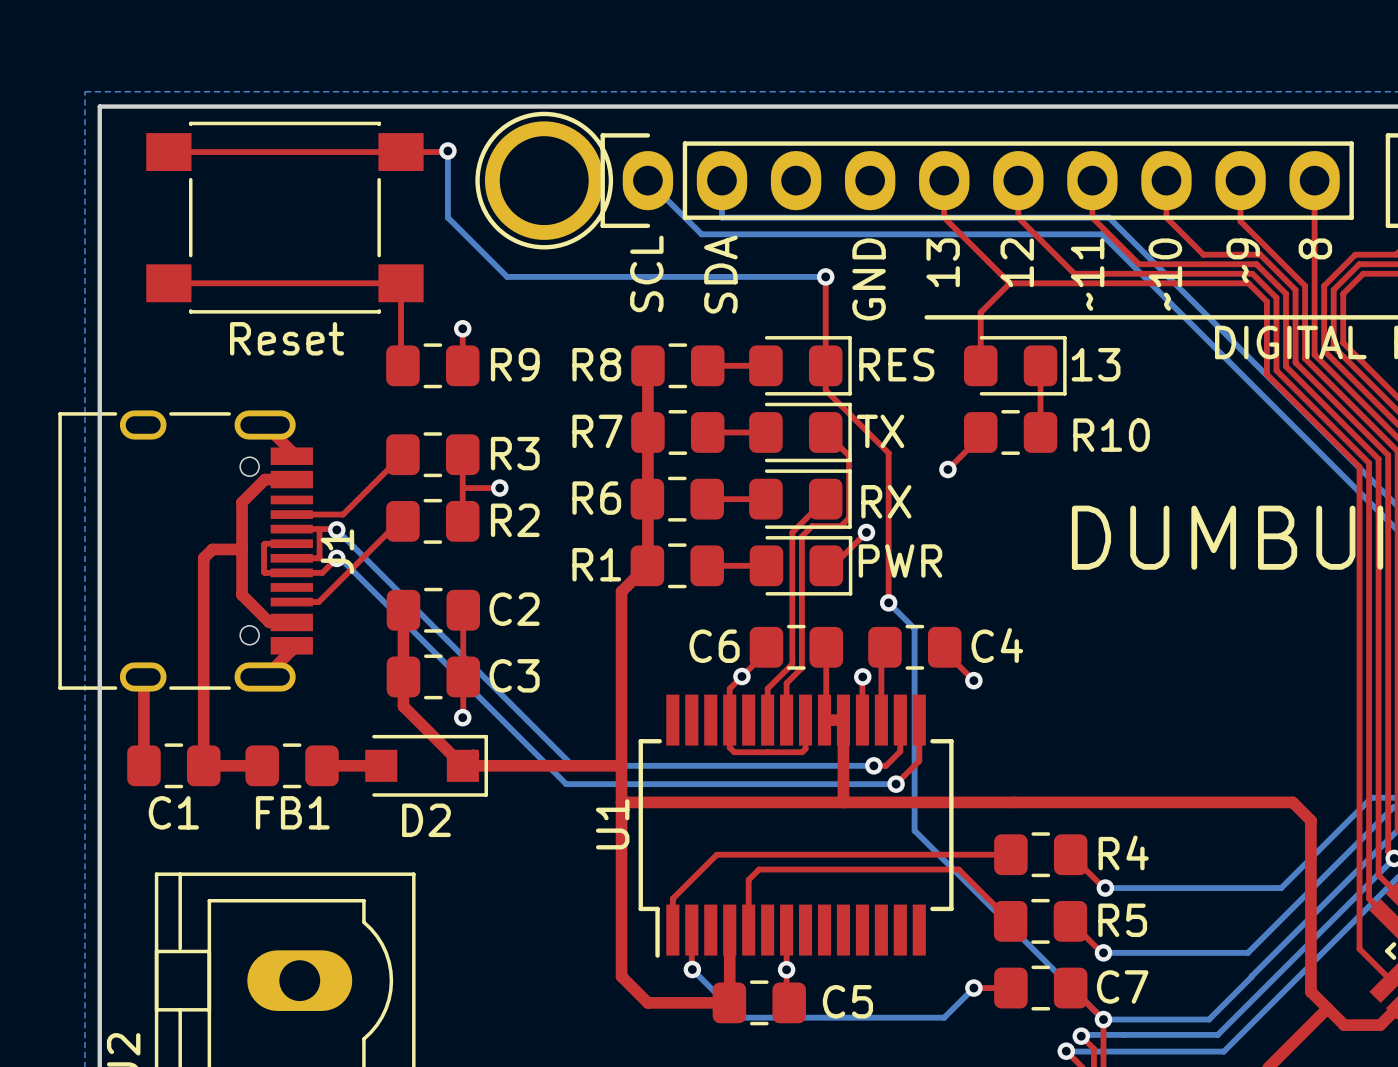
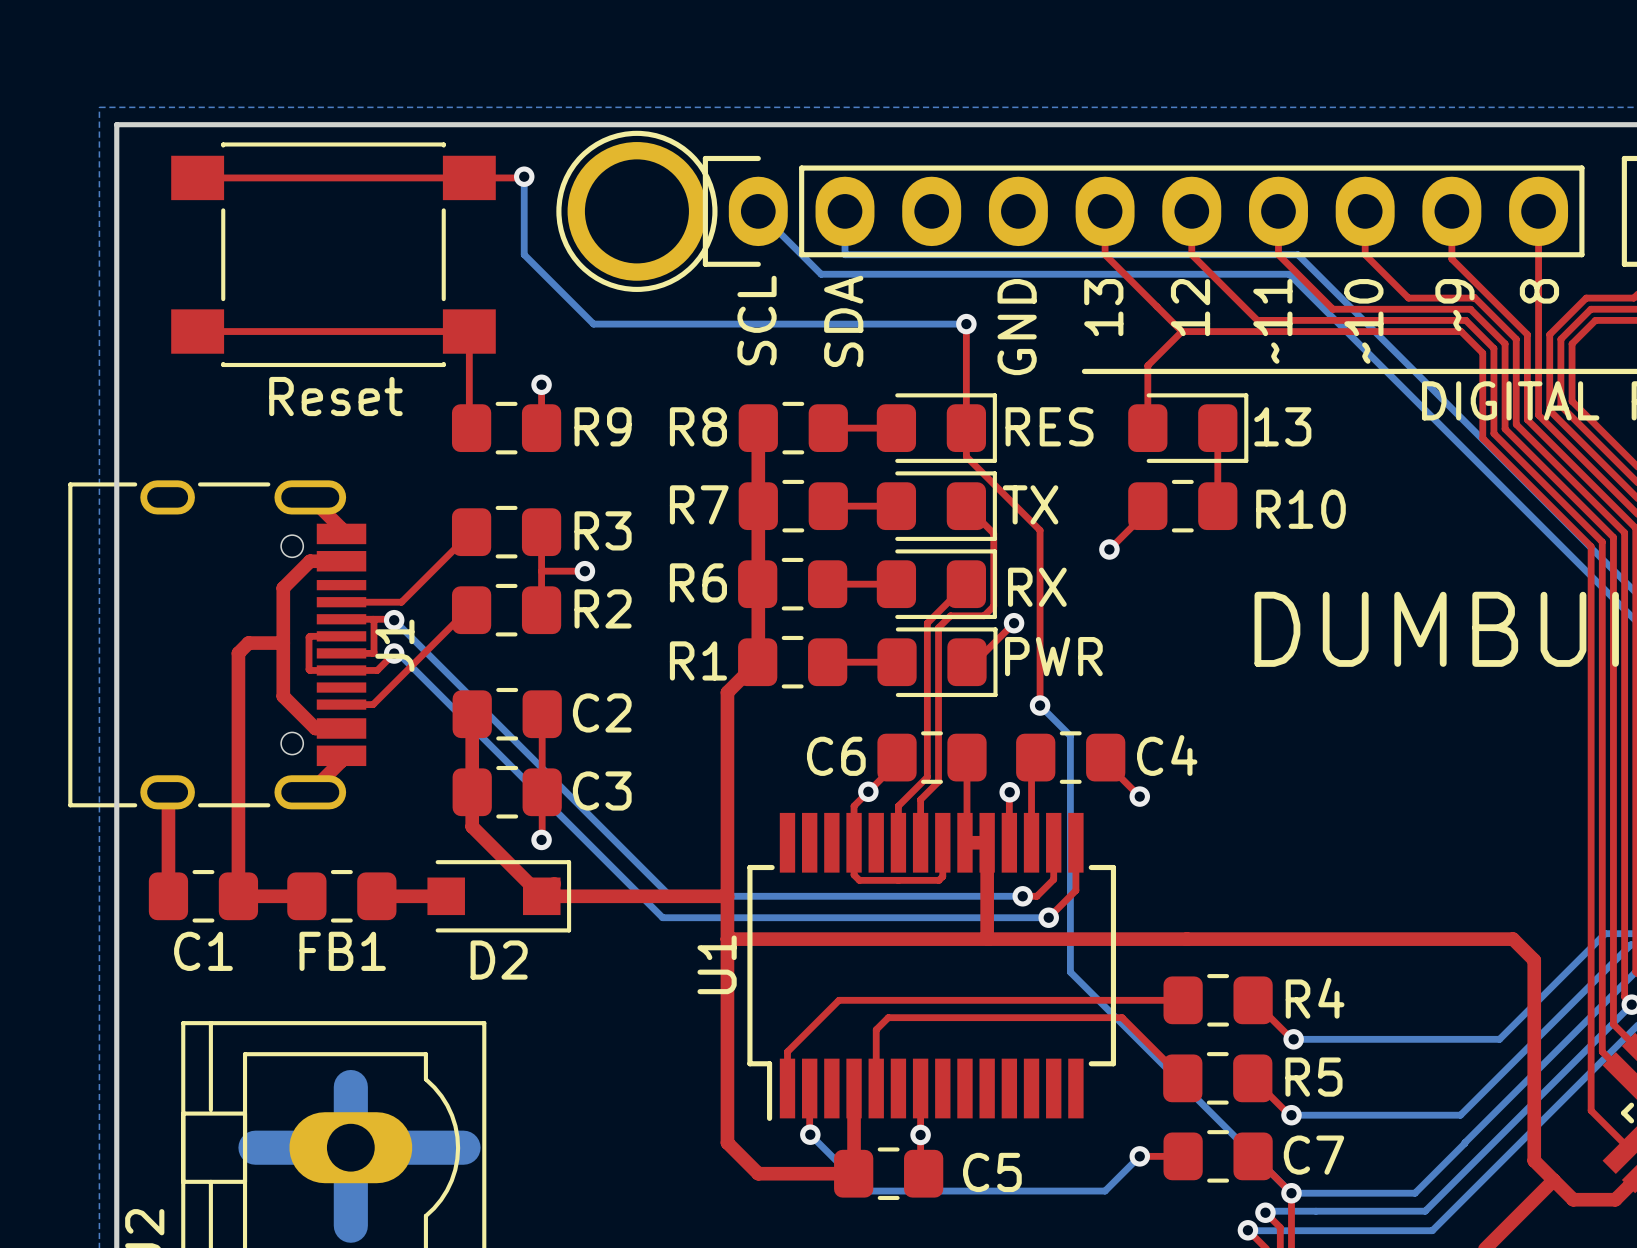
bottom track: none -> (350, 1087) (350, 1225)
bottom track: none -> (255, 1147) (463, 1147)

